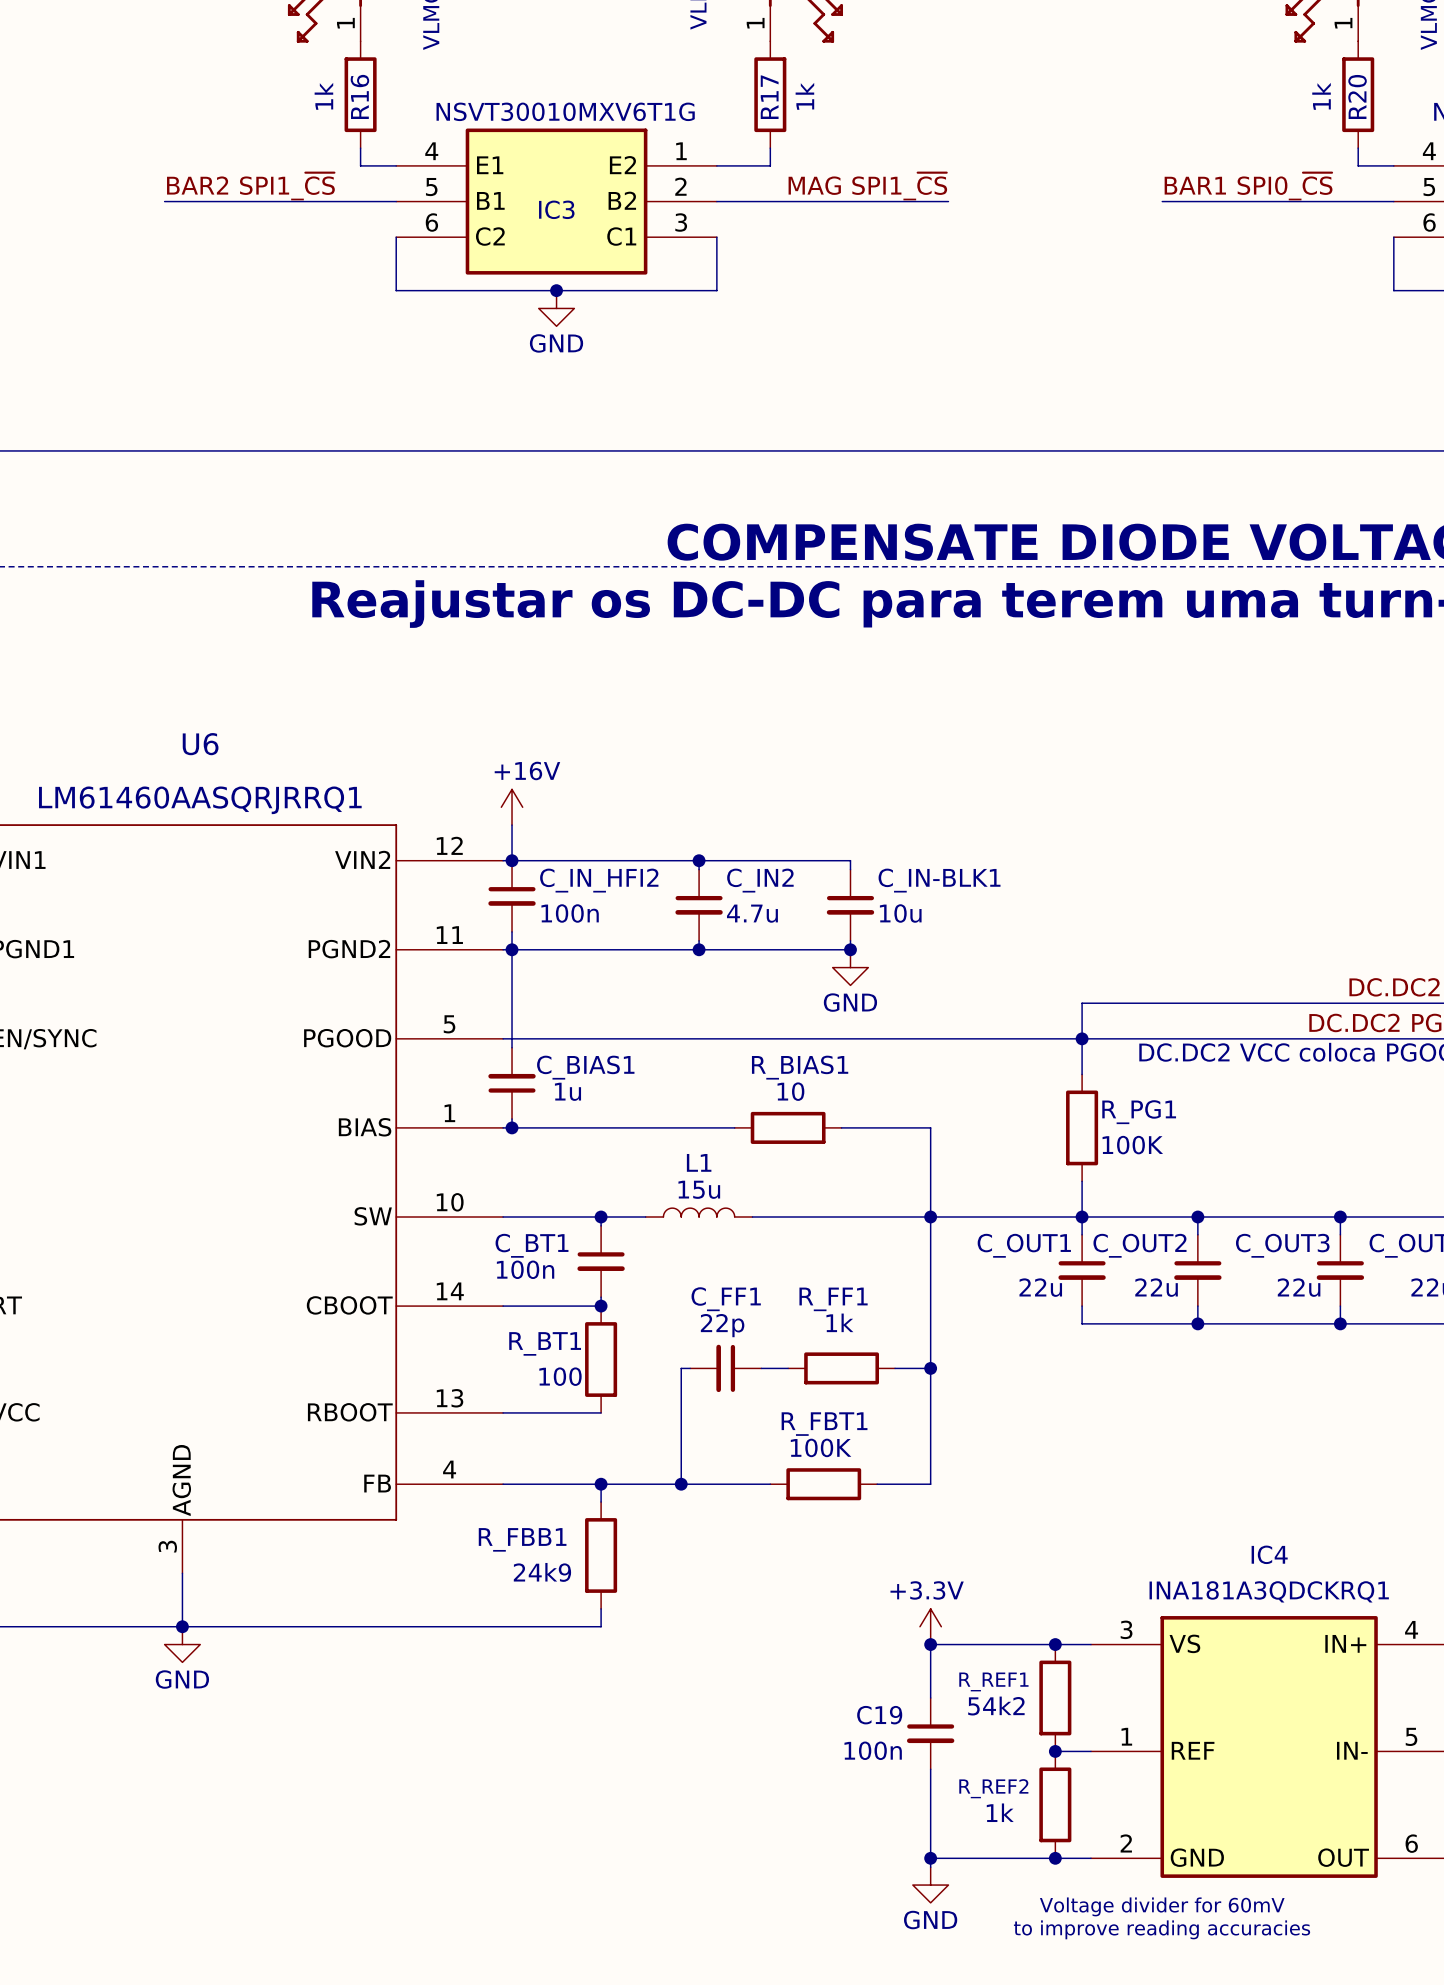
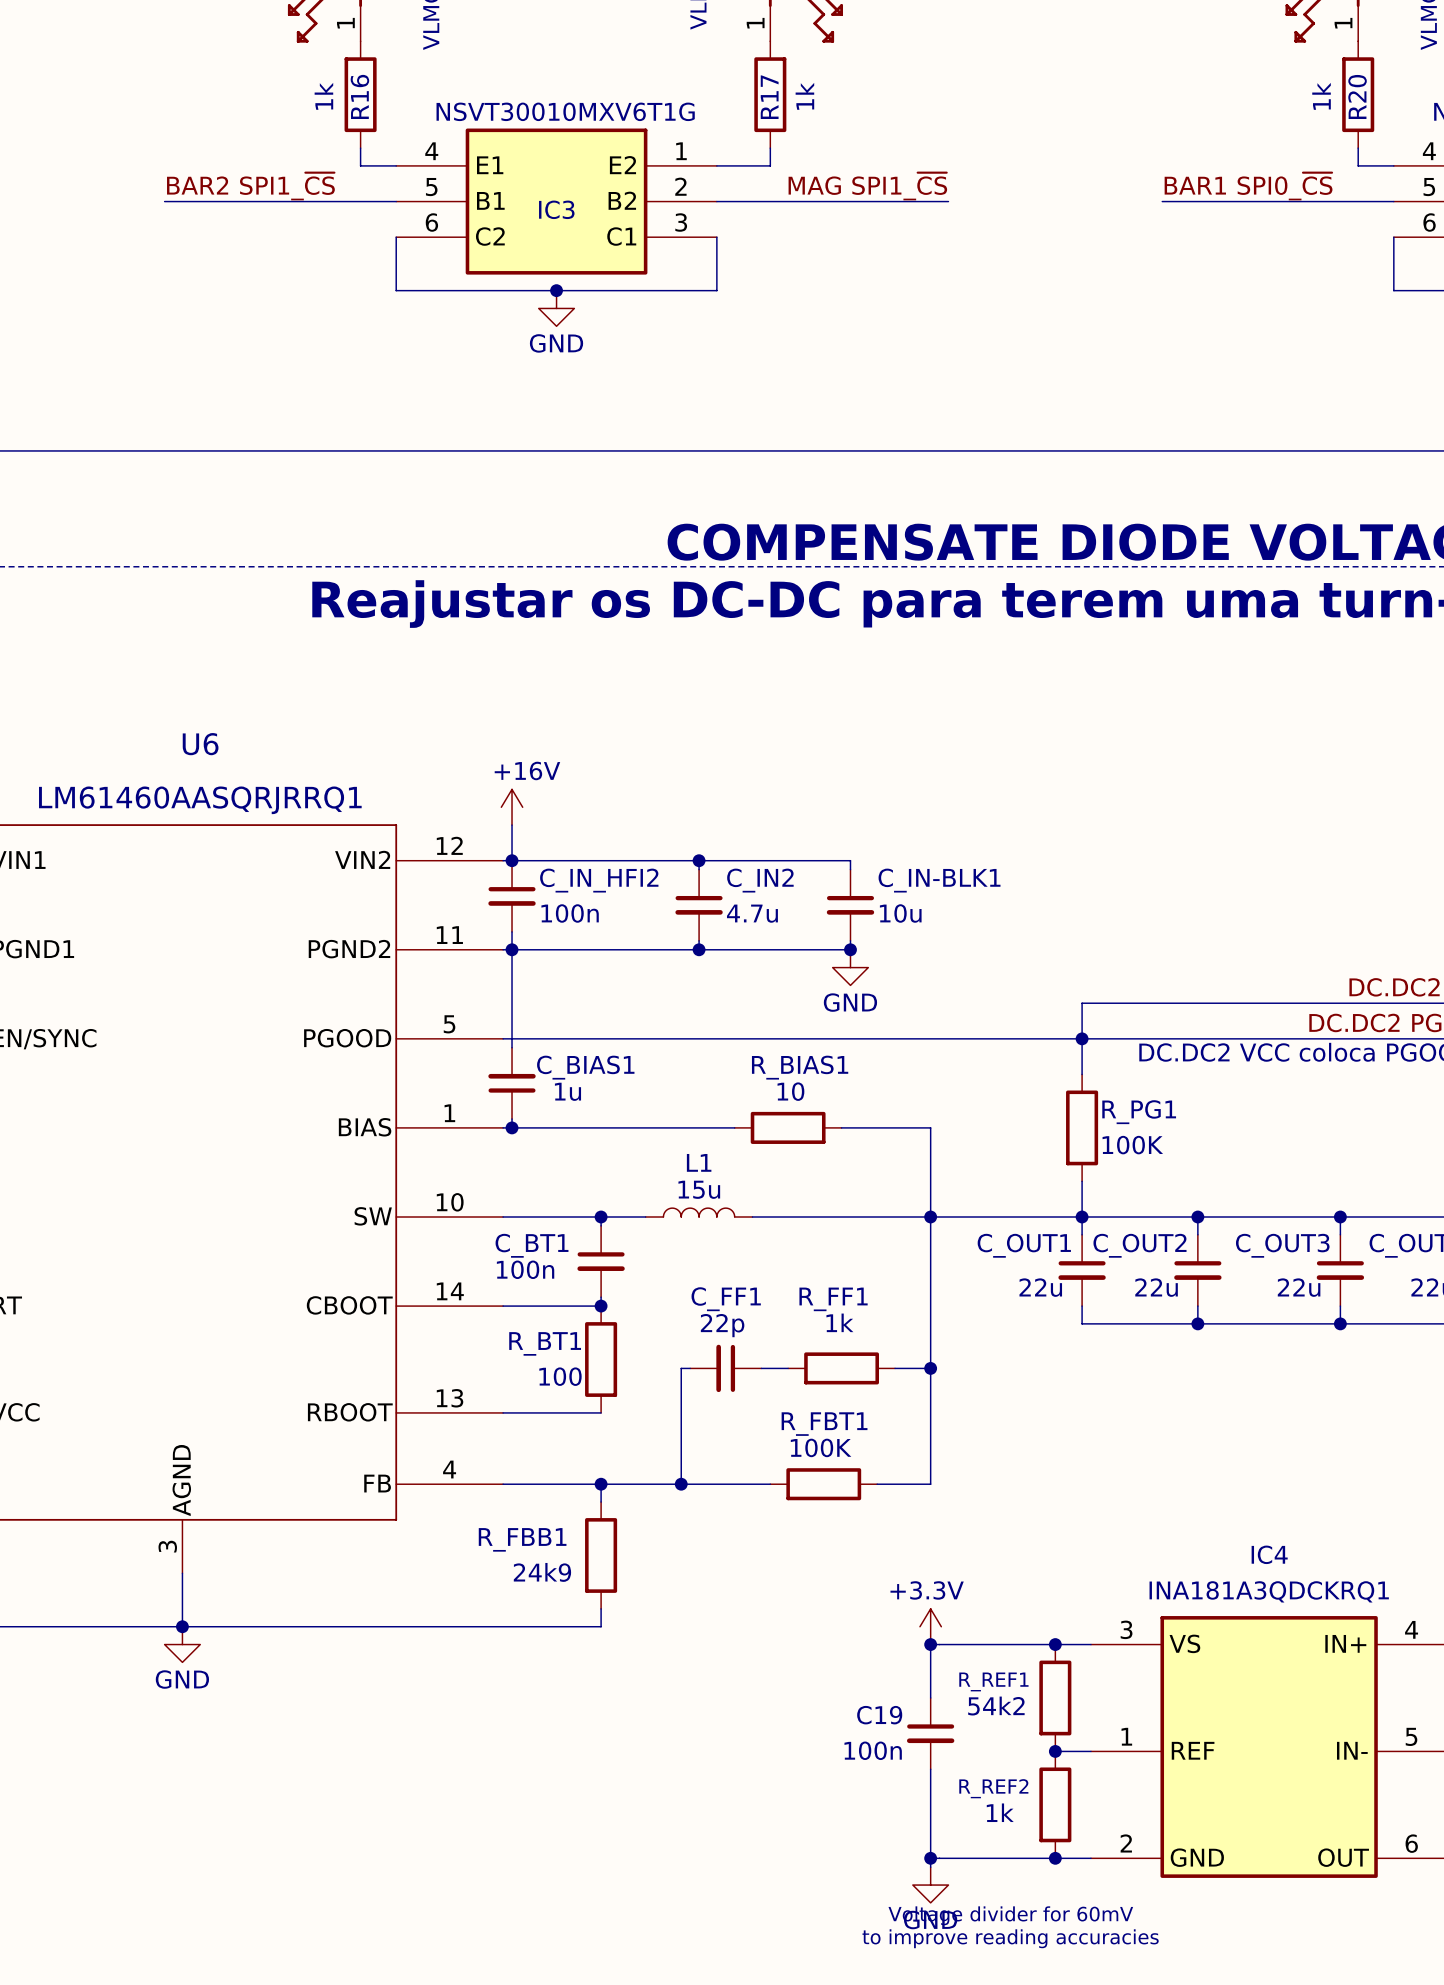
text position: Voltage divider for 60mV (1162, 1906) -> Voltage divider for 60mV (1010, 1915)
text position: to improve reading accuracies (1162, 1929) -> to improve reading accuracies (1010, 1938)

